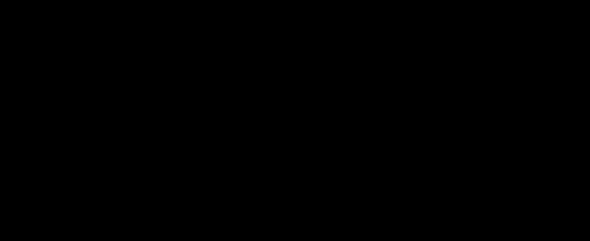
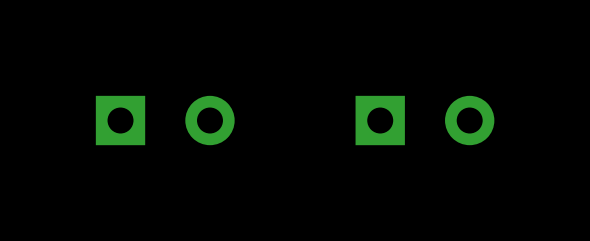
part: none -> (165, 120)
part: none -> (424, 120)

